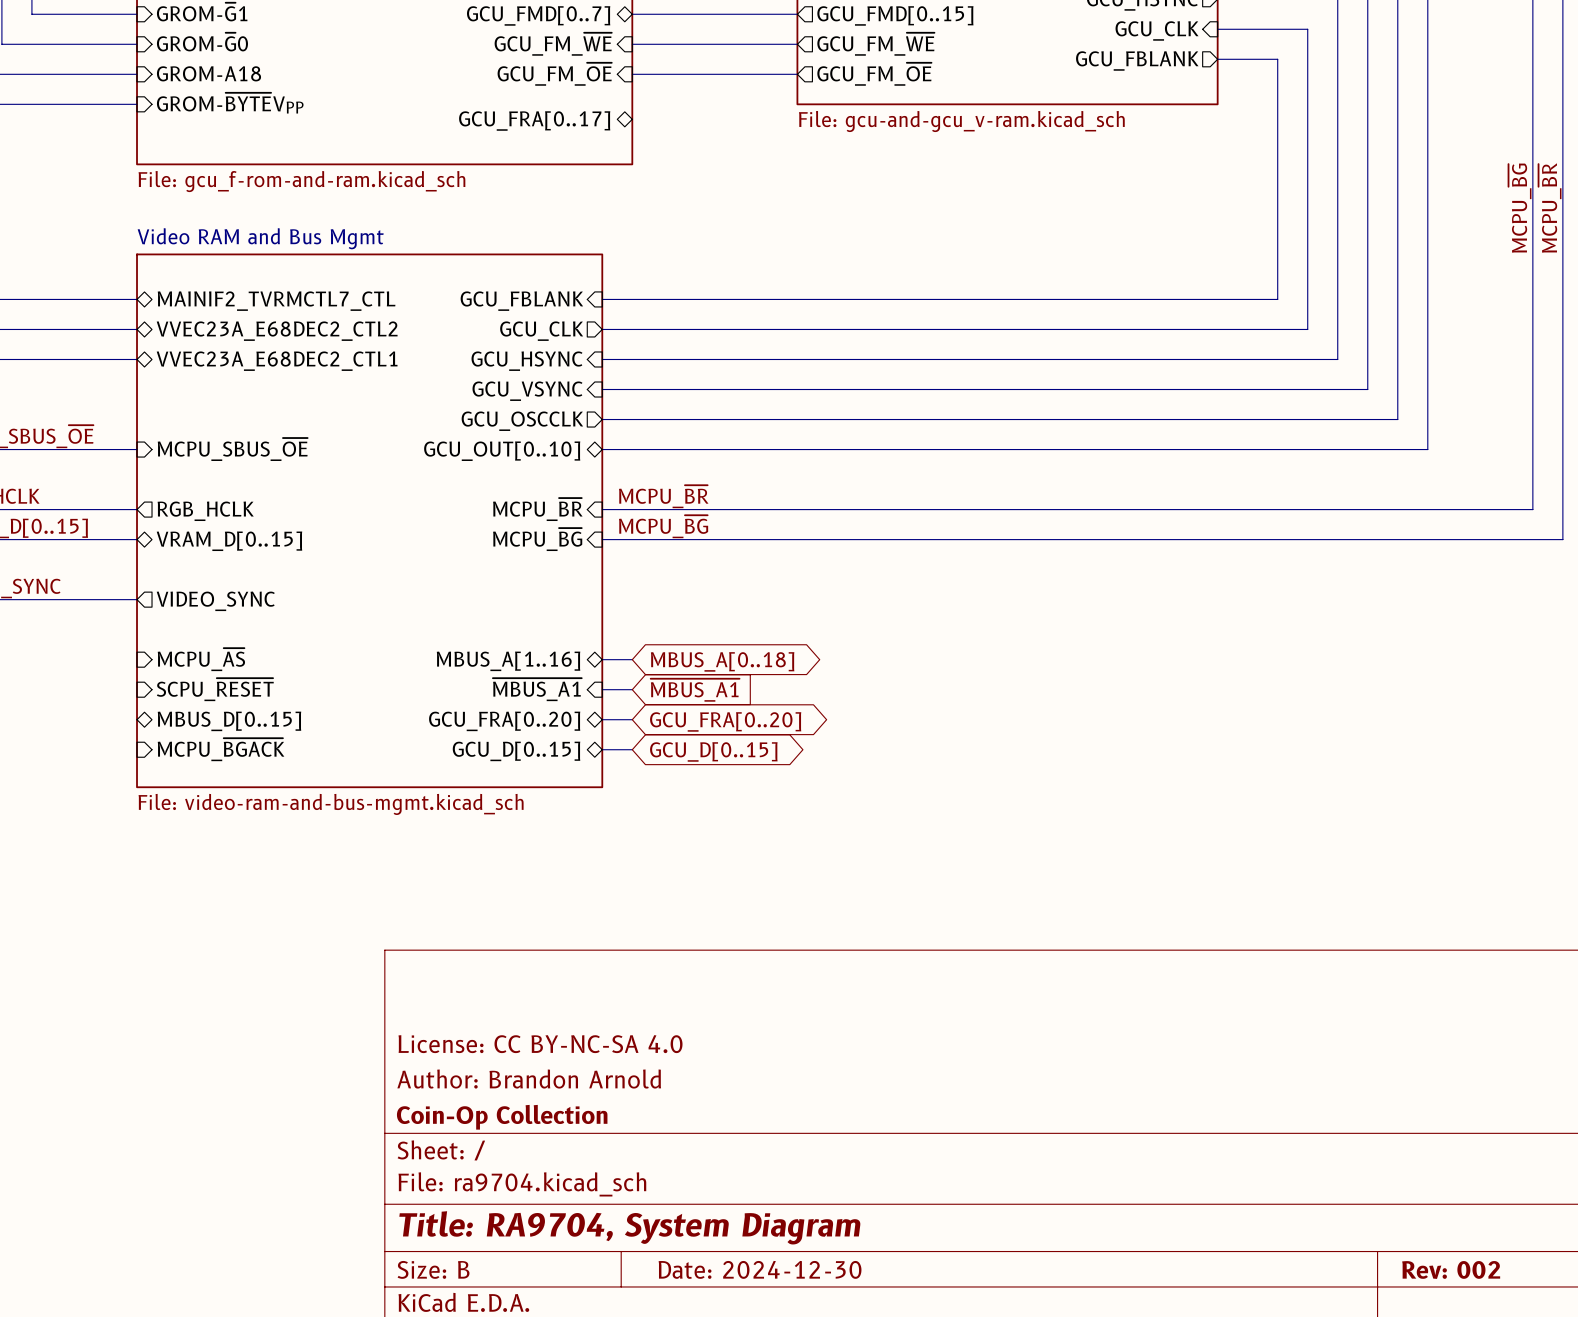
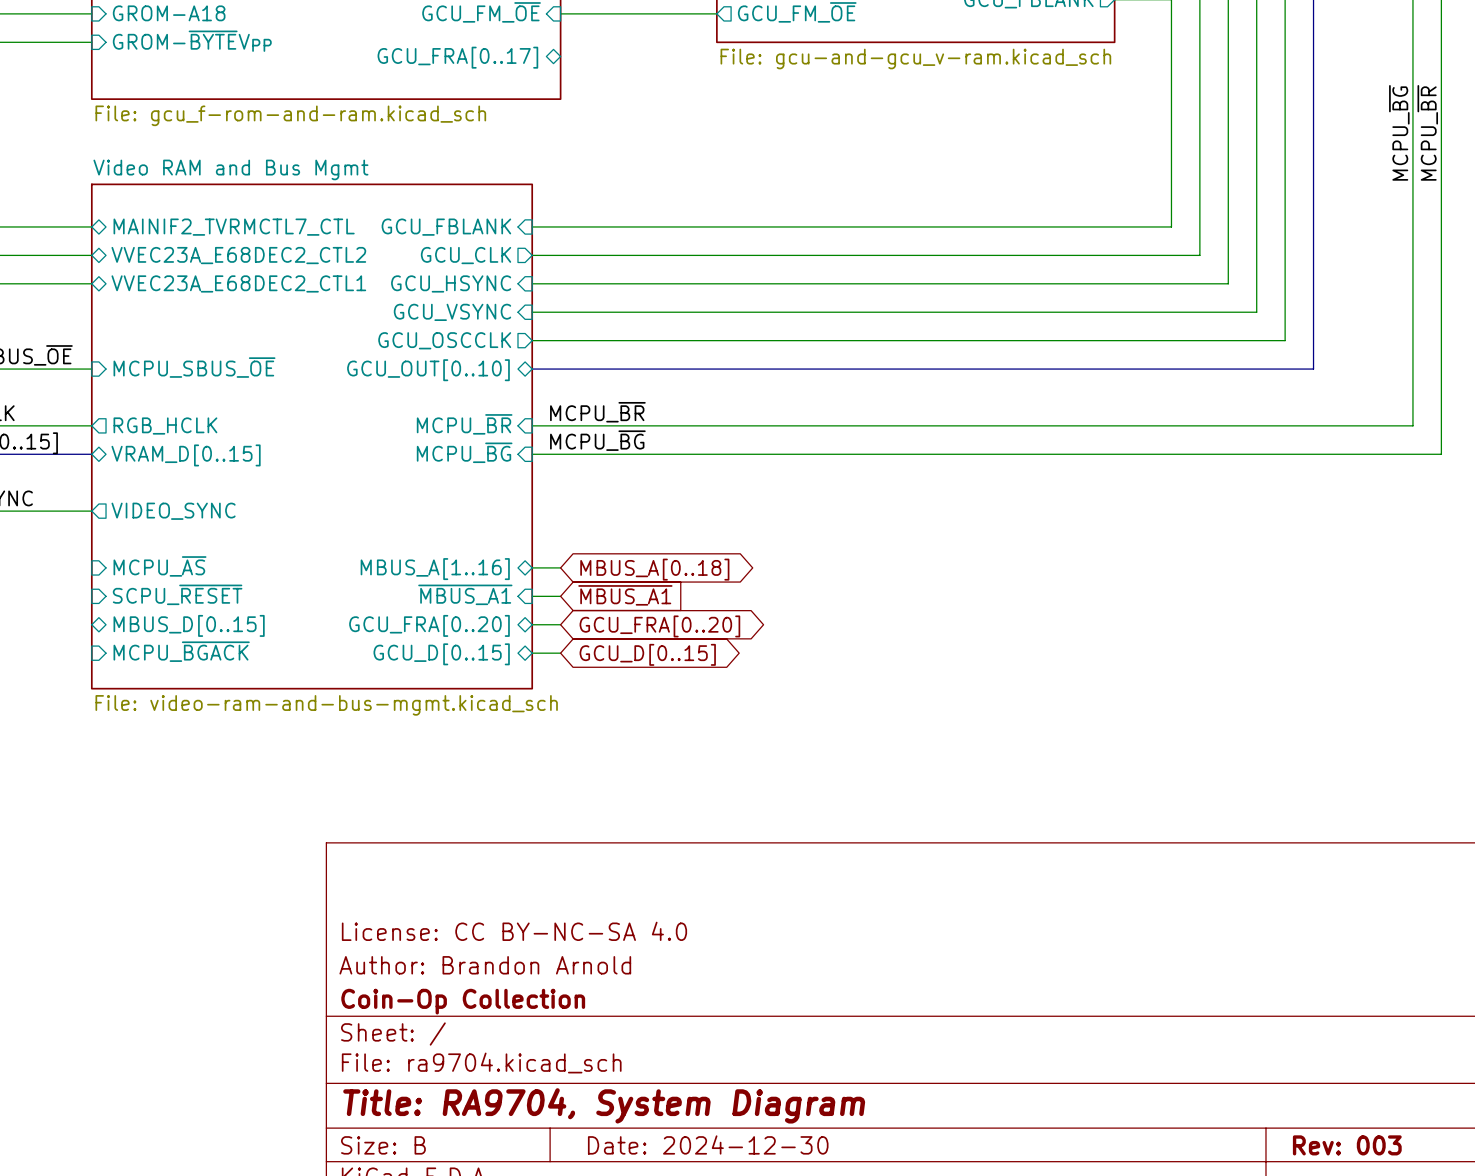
title block: Rev: 002 (1451, 1269) -> Rev: 003 (1347, 1145)

